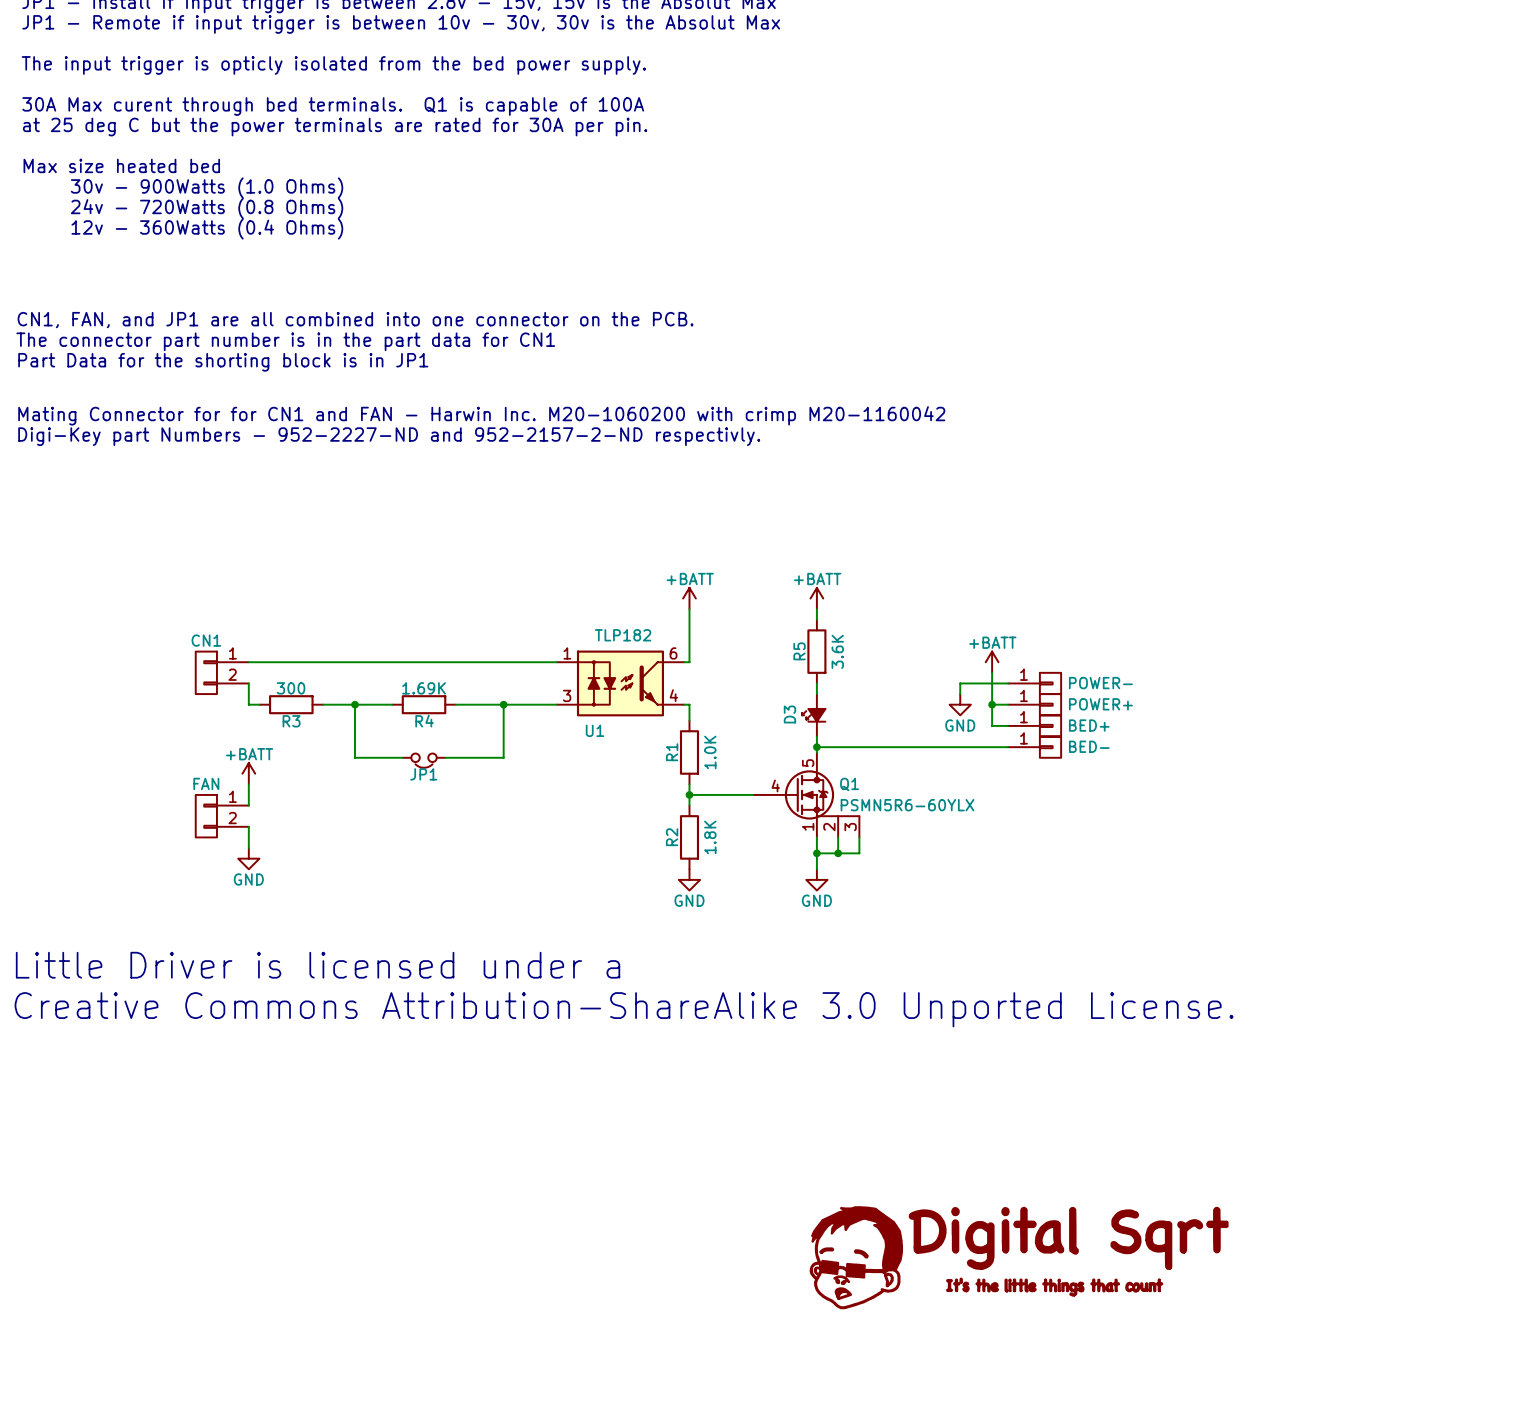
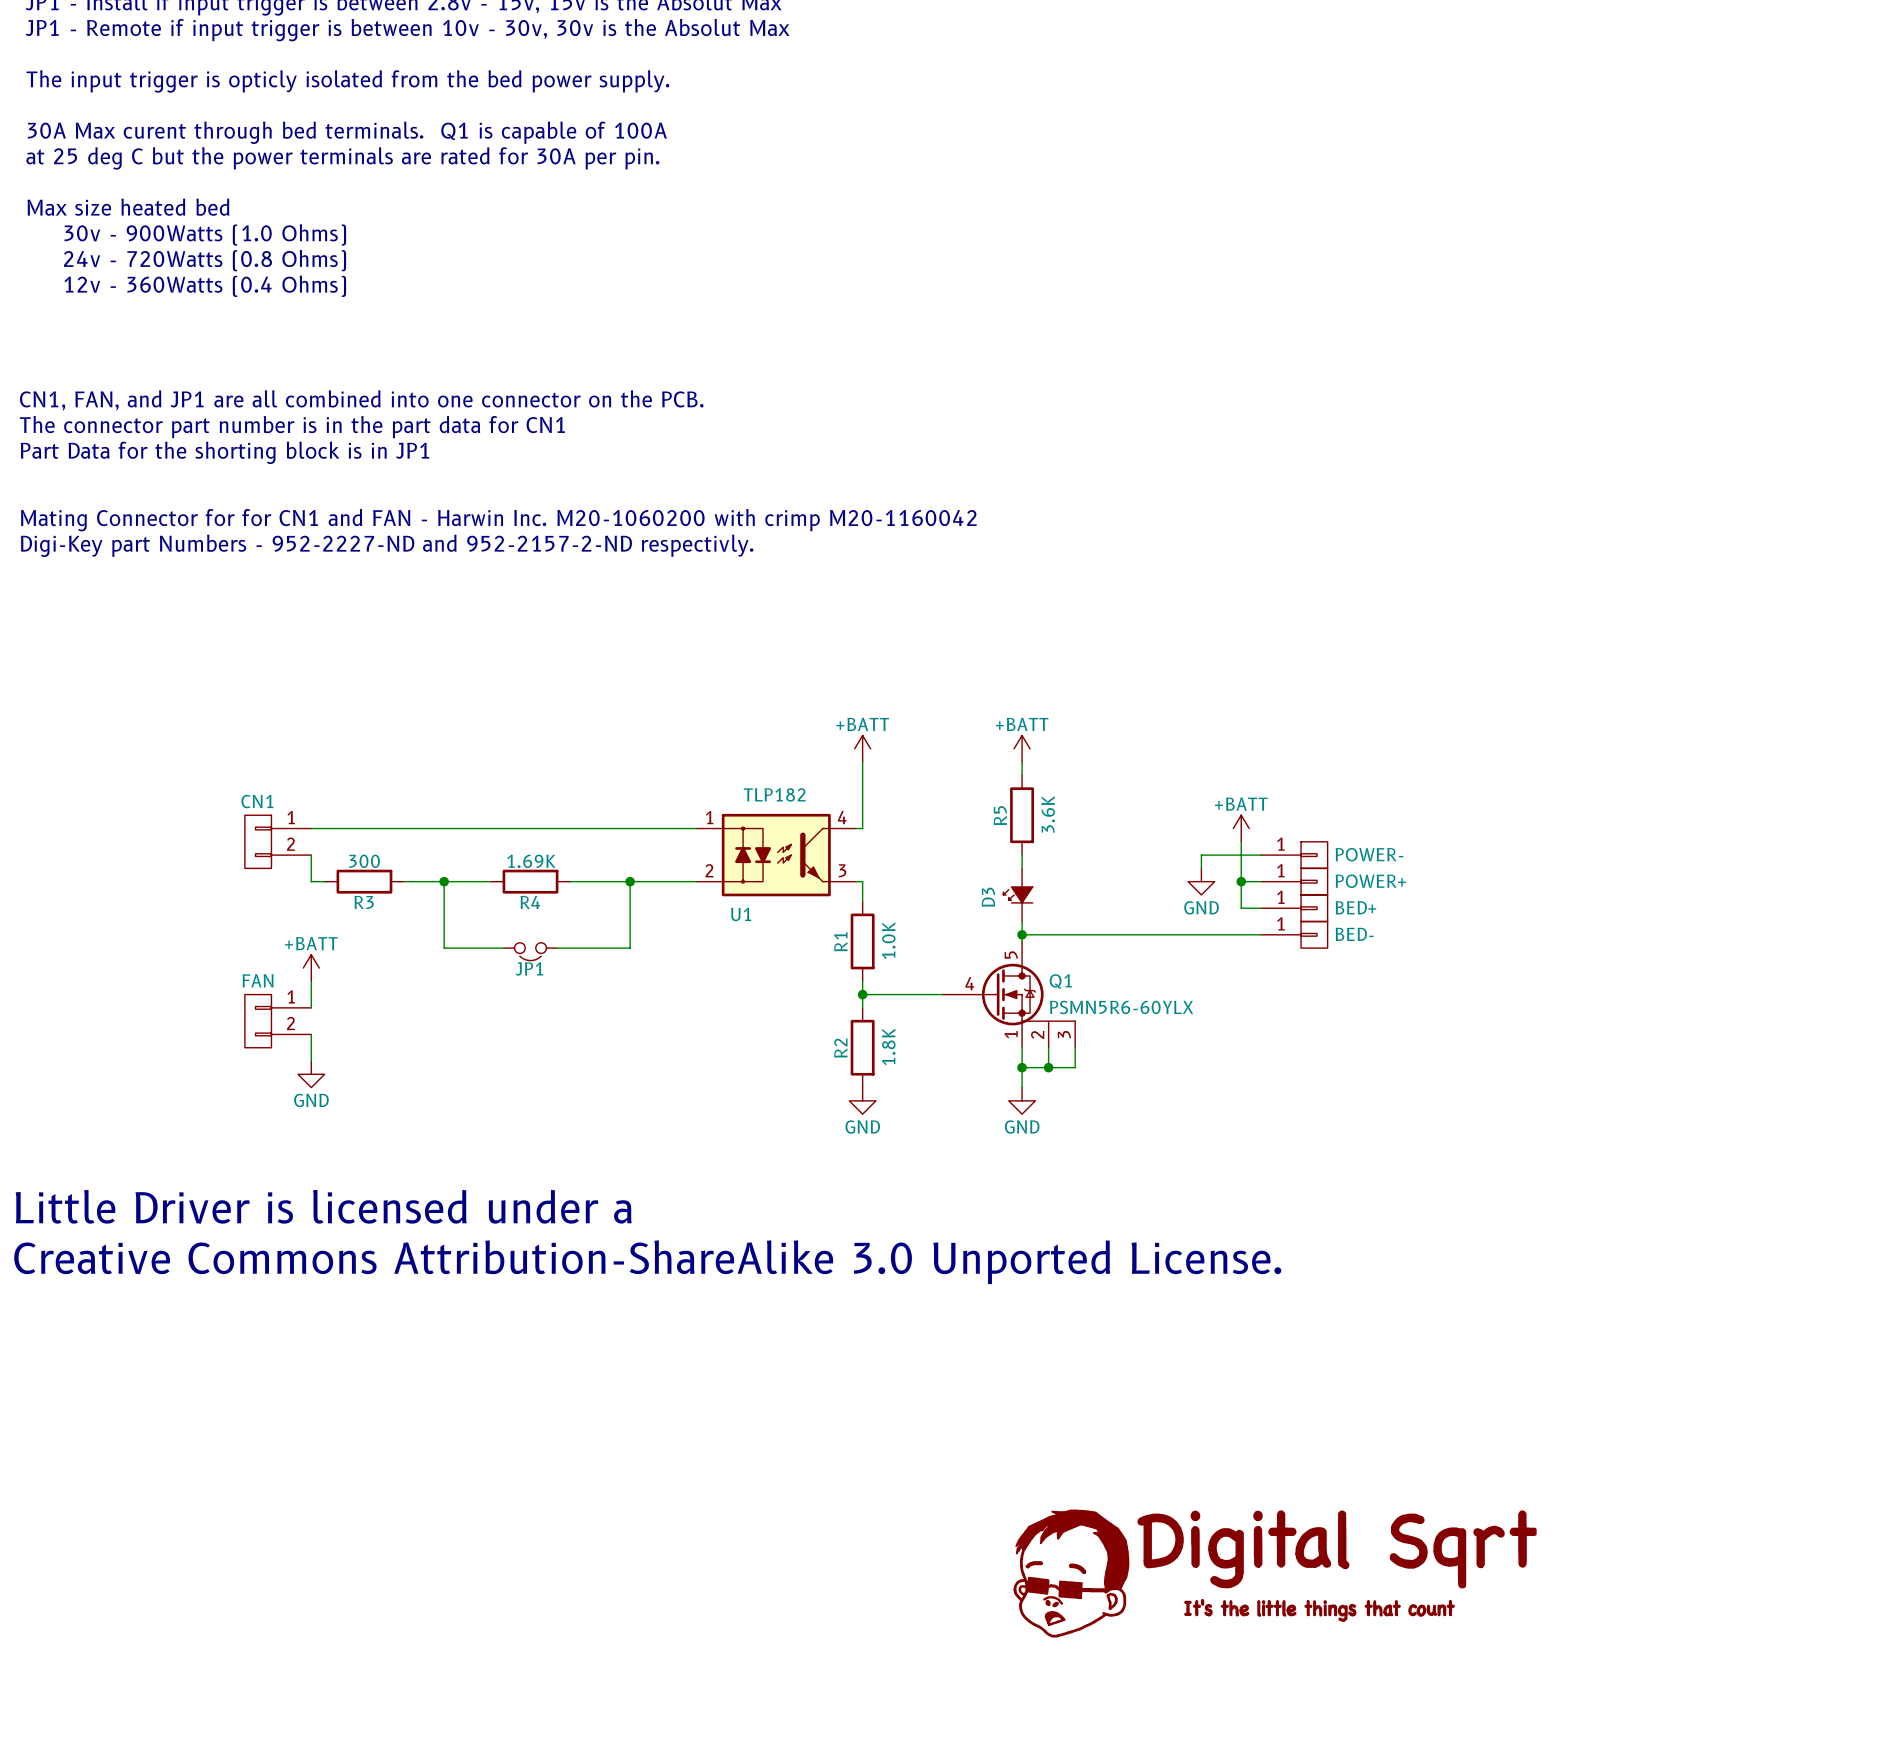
U1 pin number: 6 (673, 653) -> 4 (842, 817)
U1 pin number: 3 (567, 695) -> 2 (709, 870)
U1 pin number: 4 (673, 695) -> 3 (842, 870)

